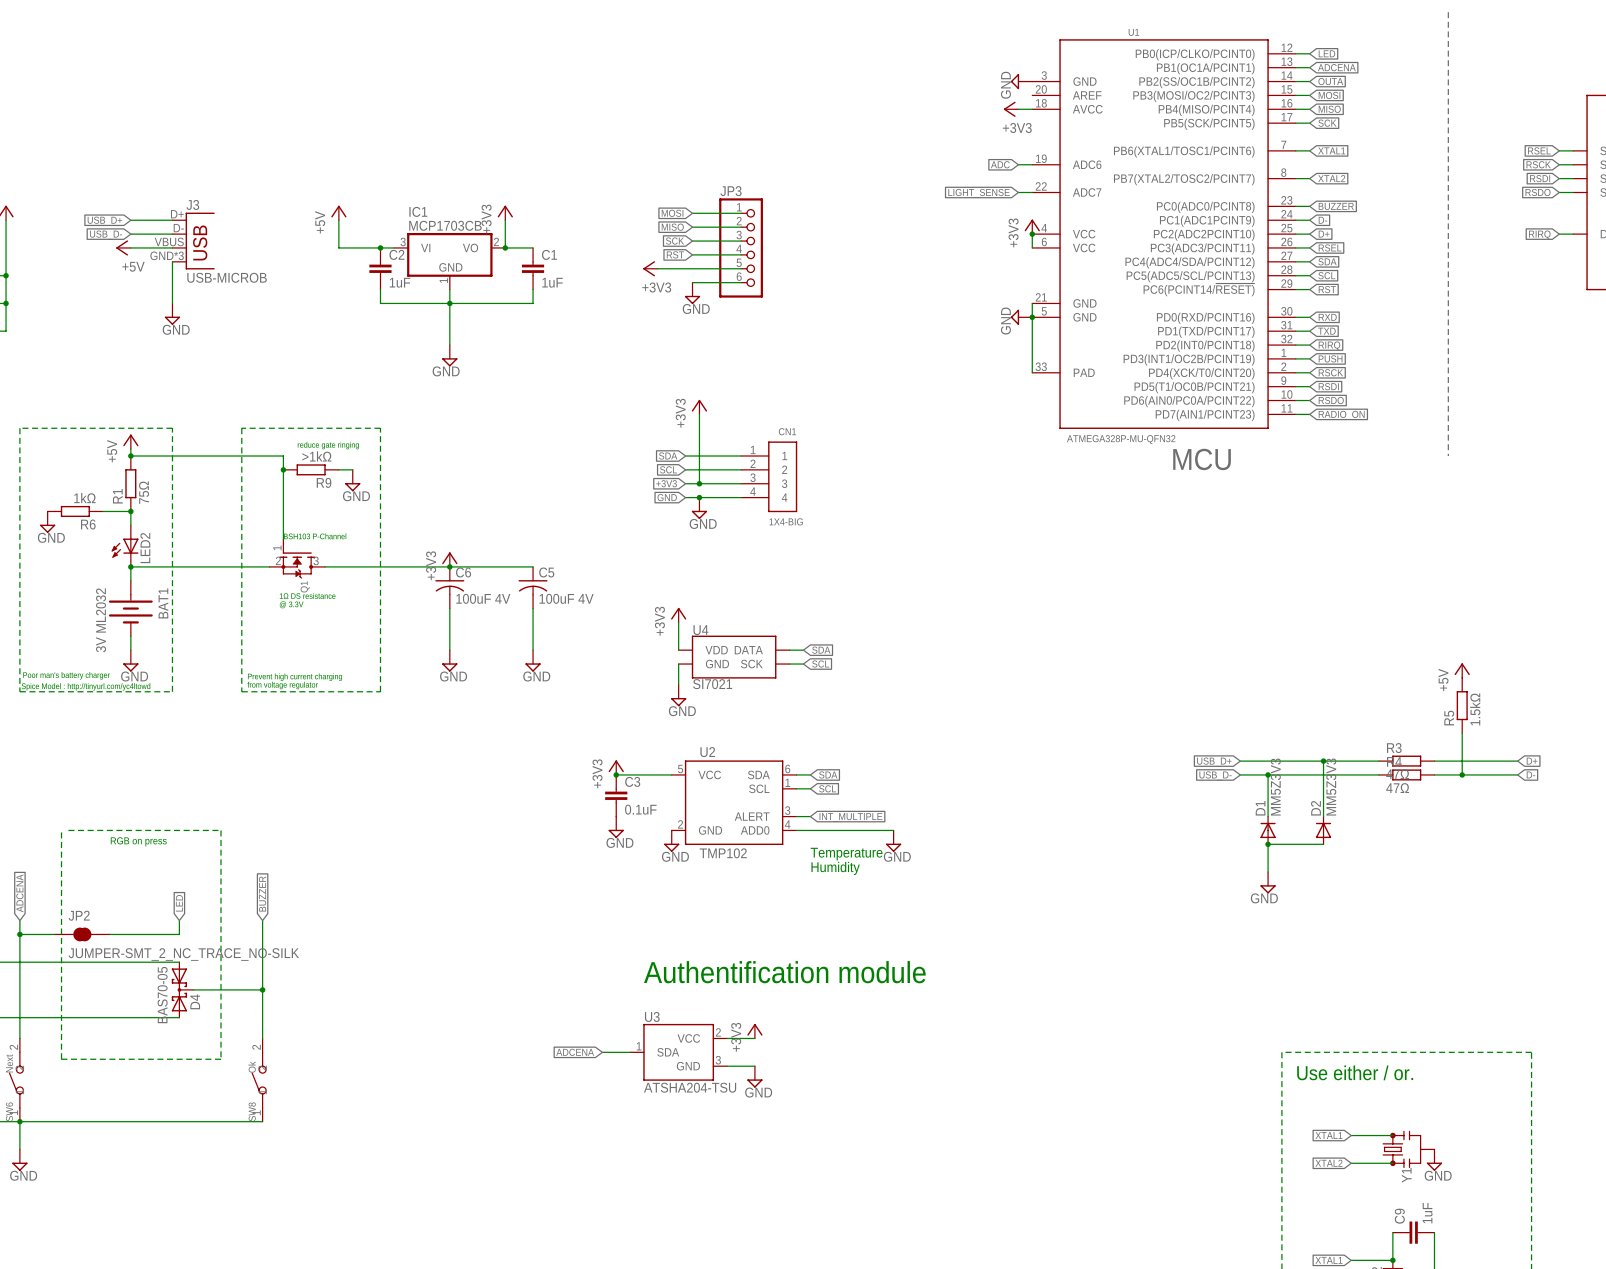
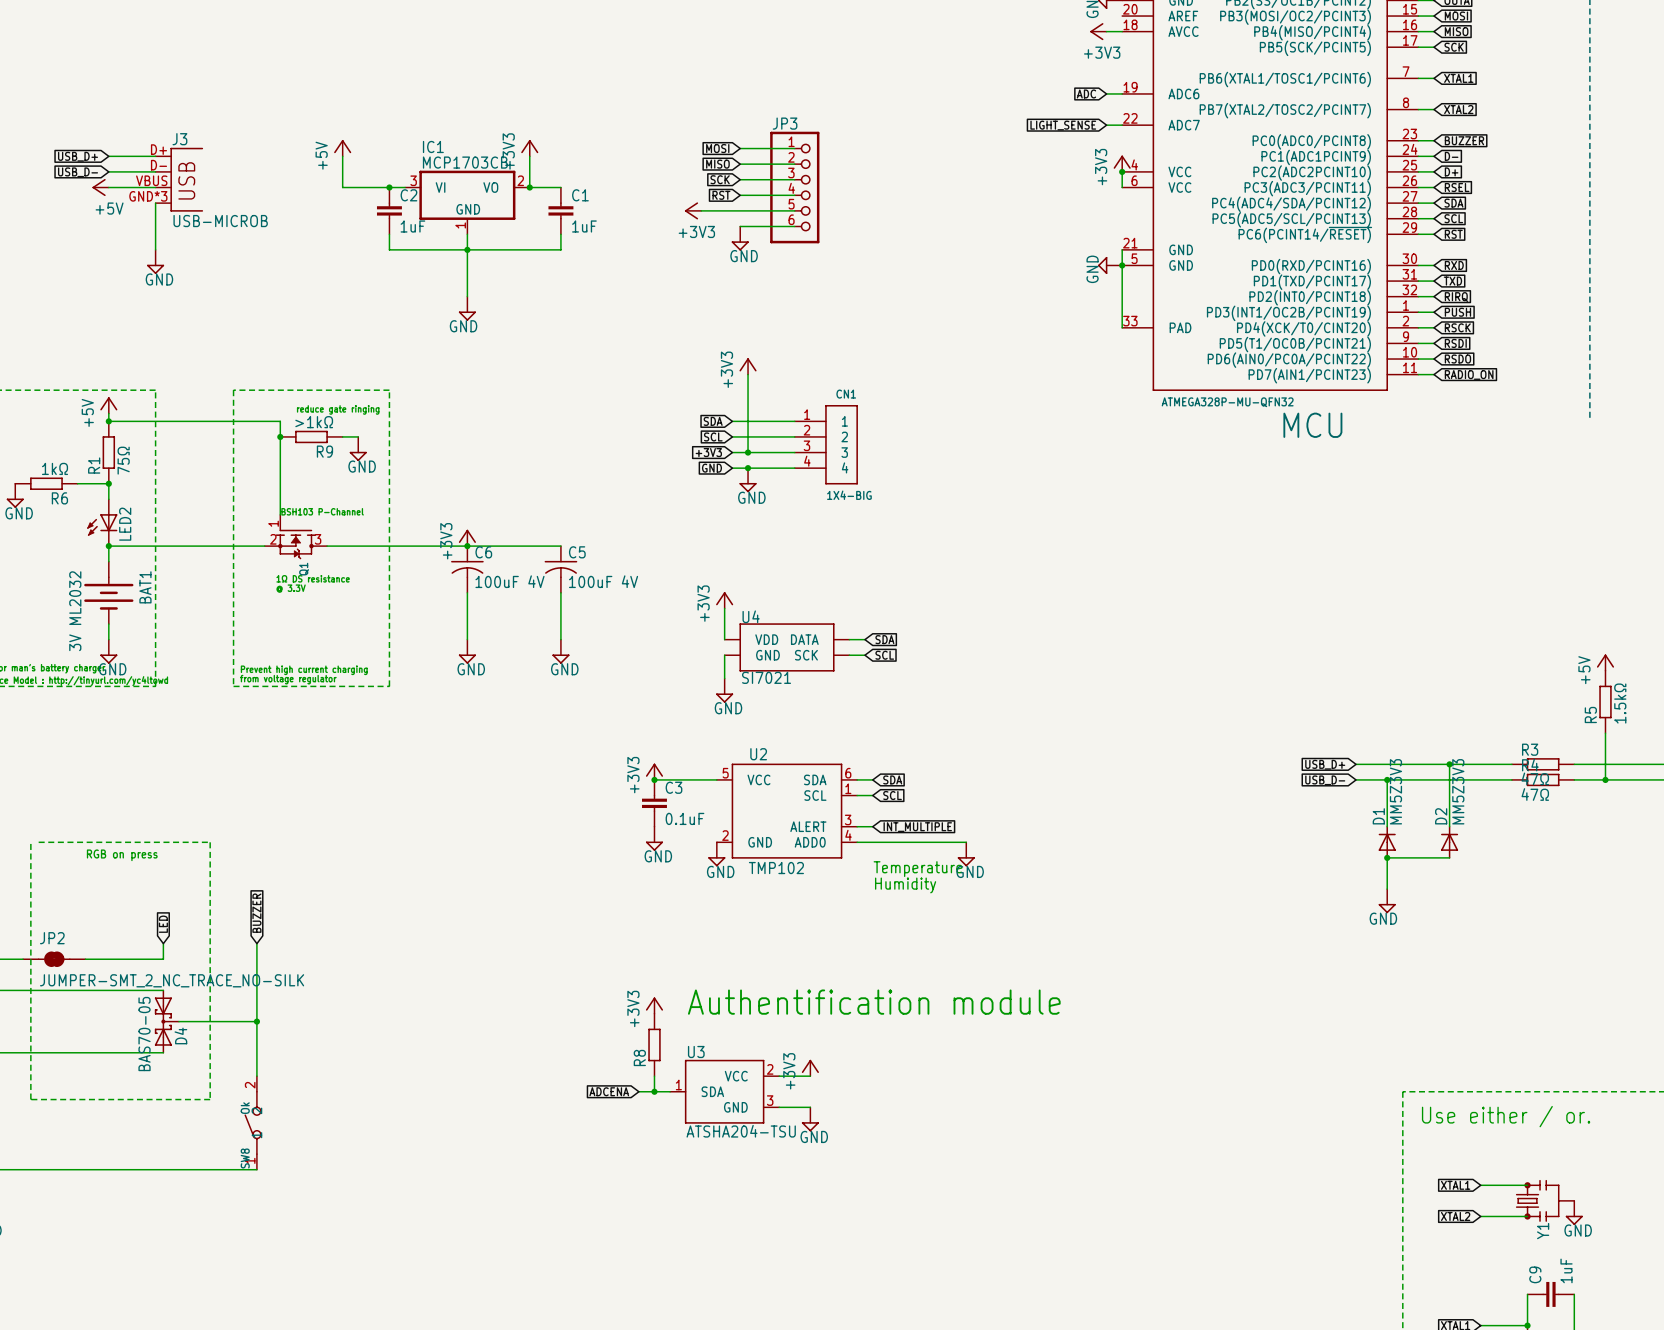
power symbol: none -> +3V3 (654, 1005)
R8: none -> (654, 1044)
wire: none -> (654, 1076) (654, 1091)
junction: none -> (654, 1091)

